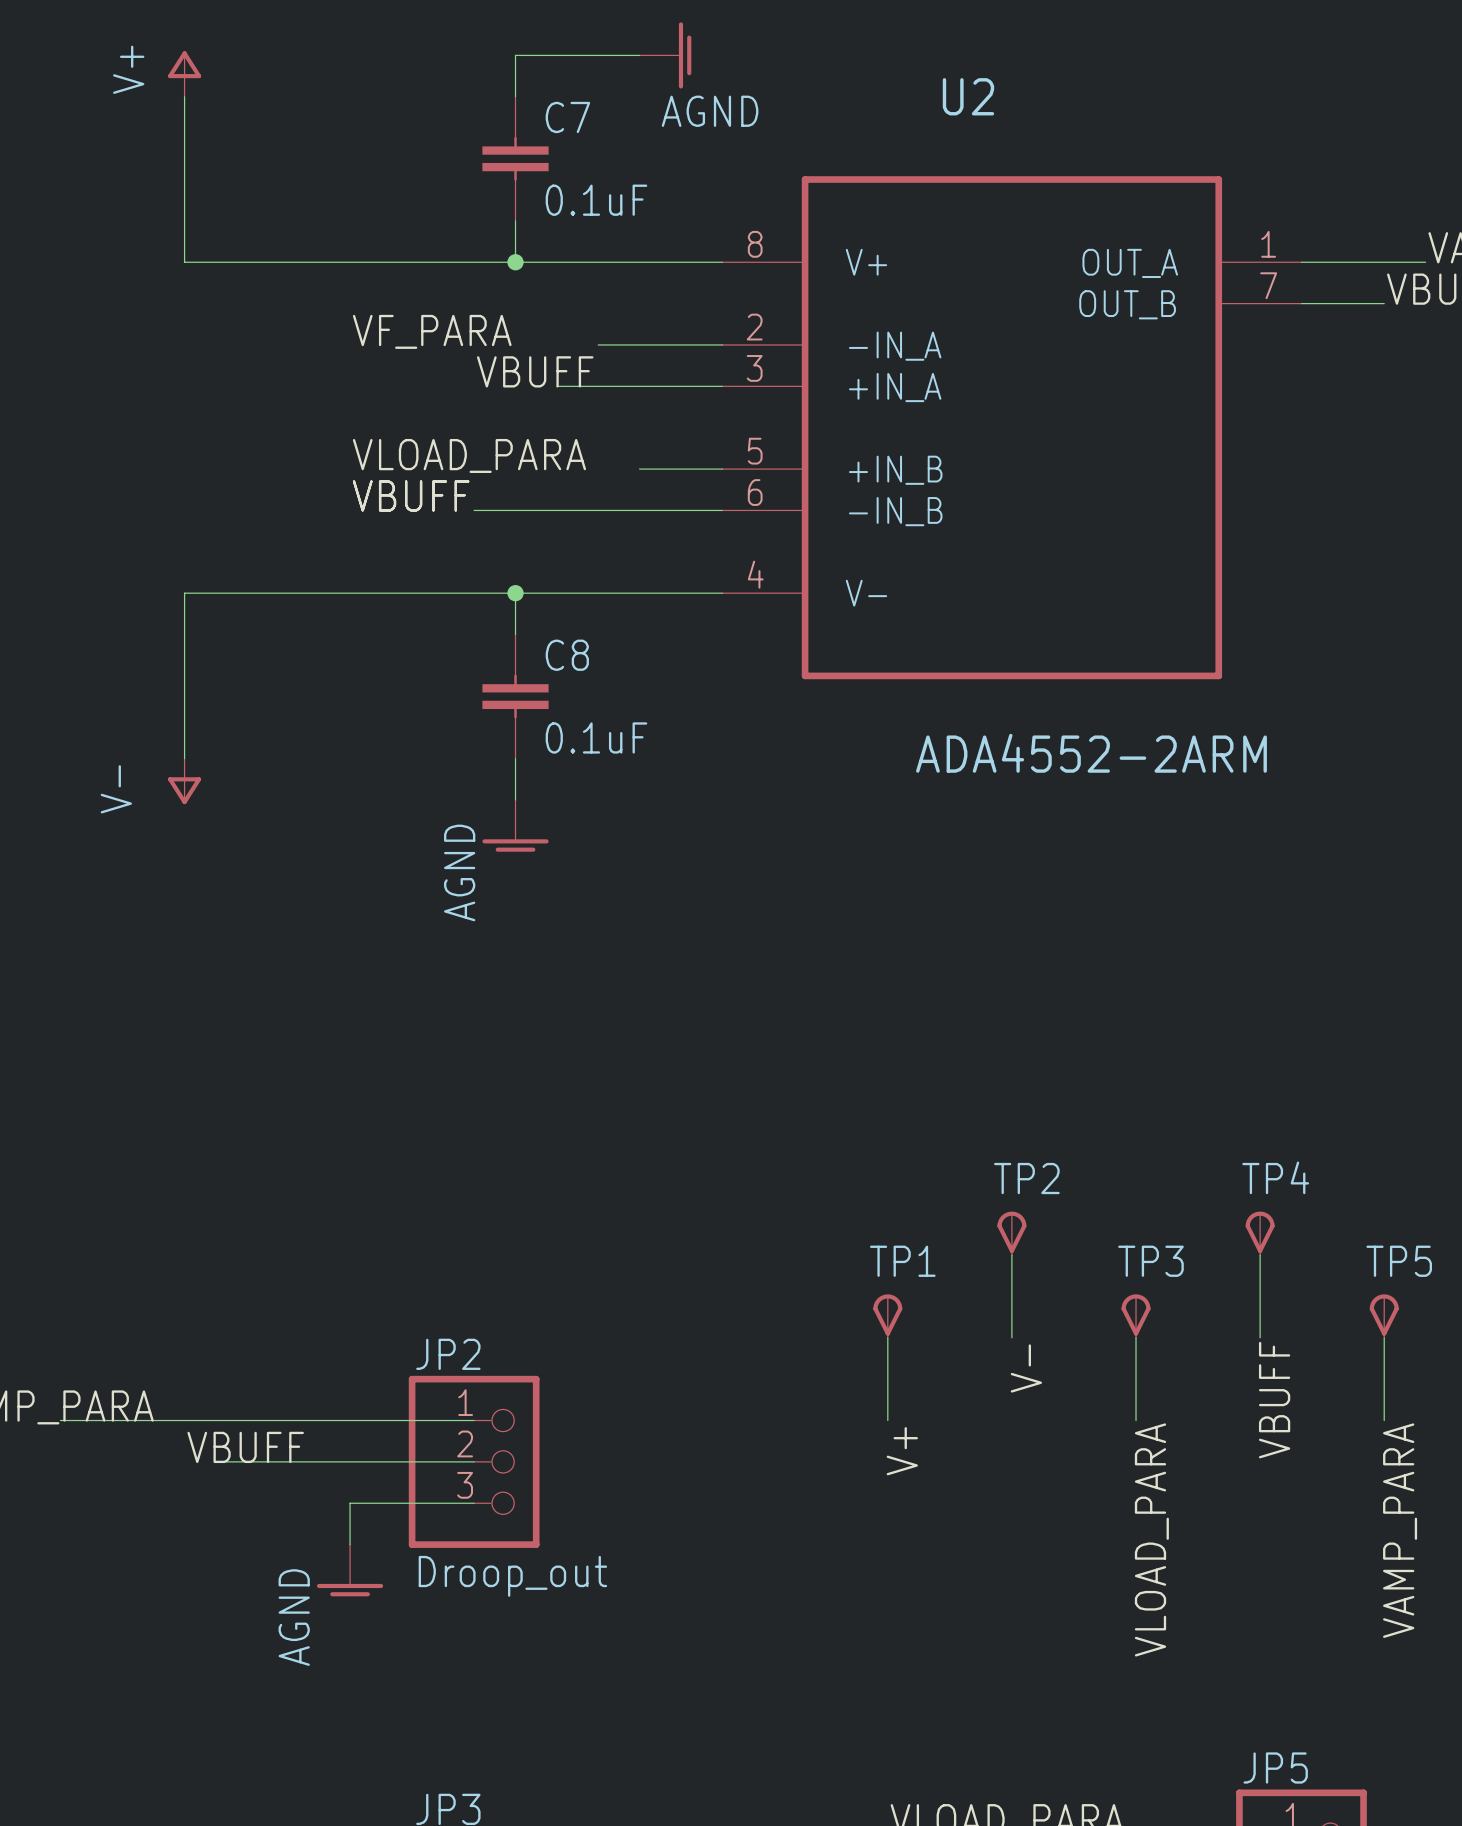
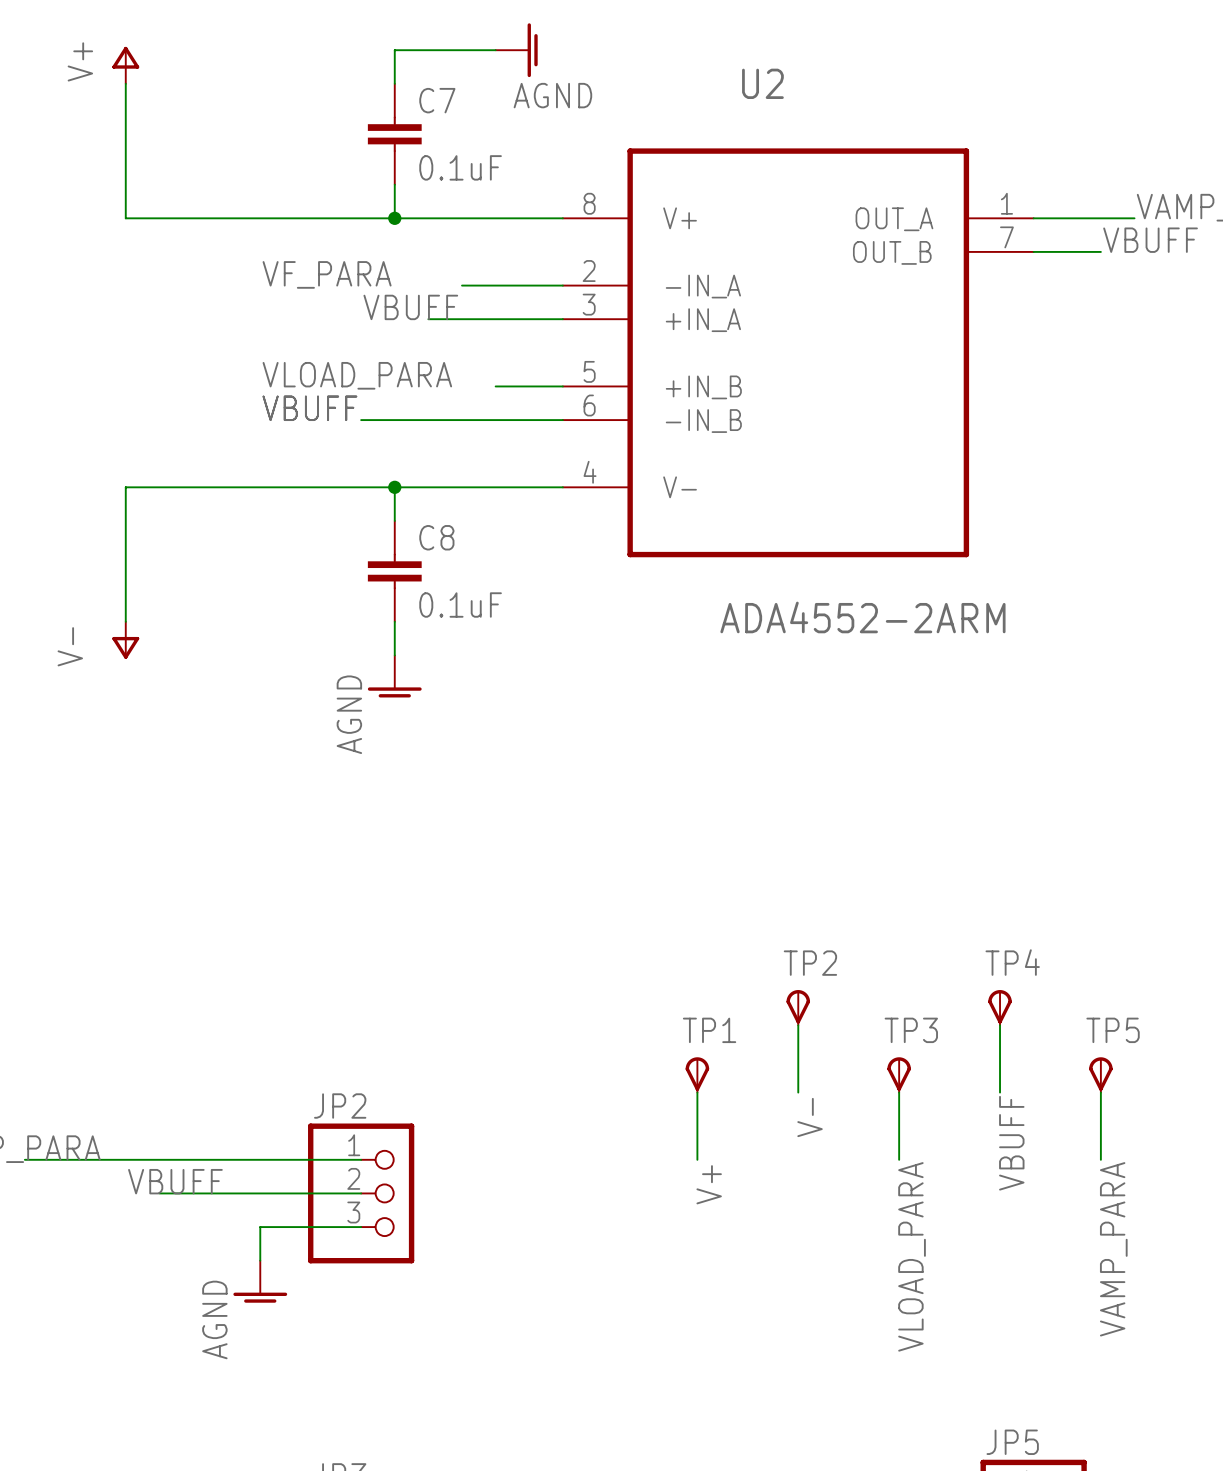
JP2 value: Droop_out (512, 1576) -> none

